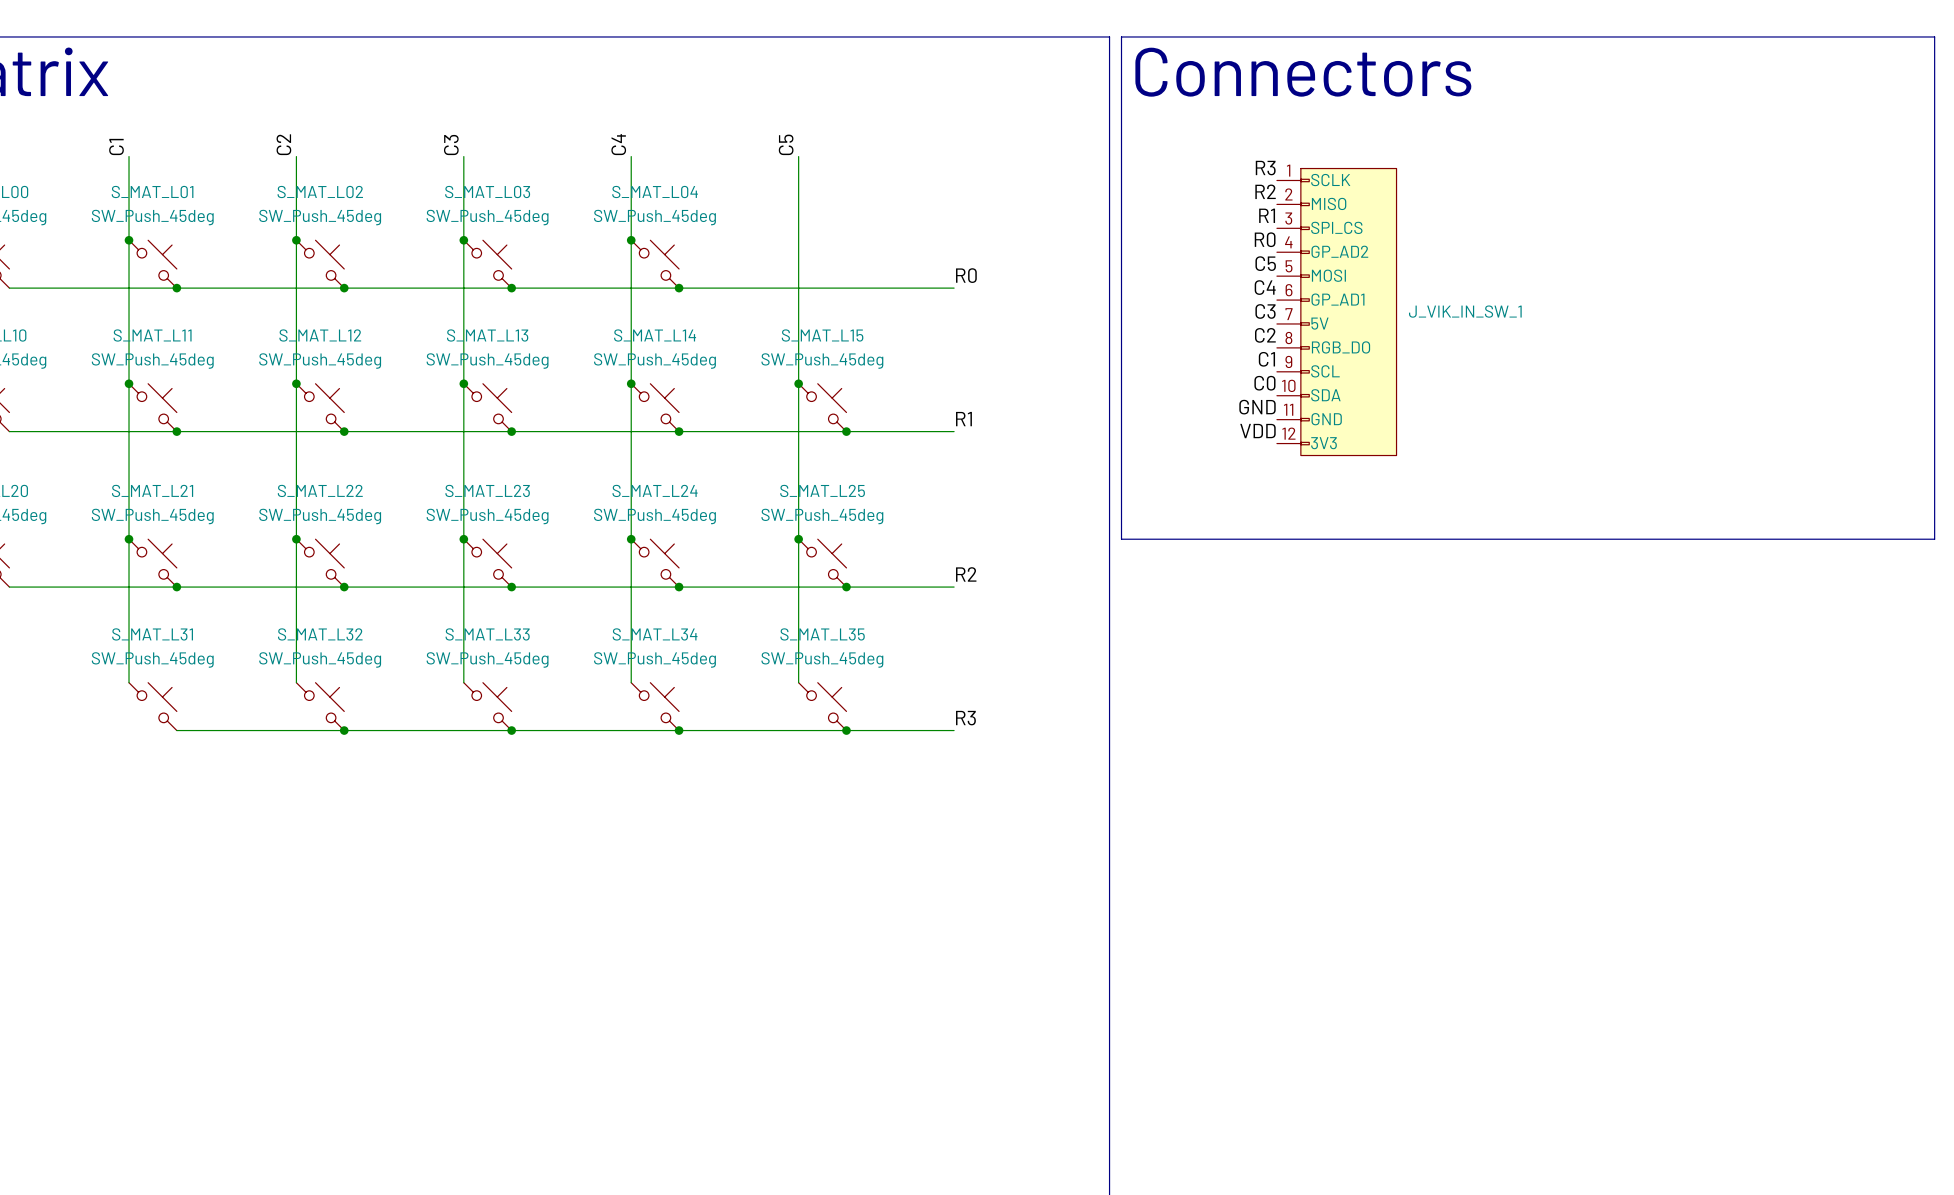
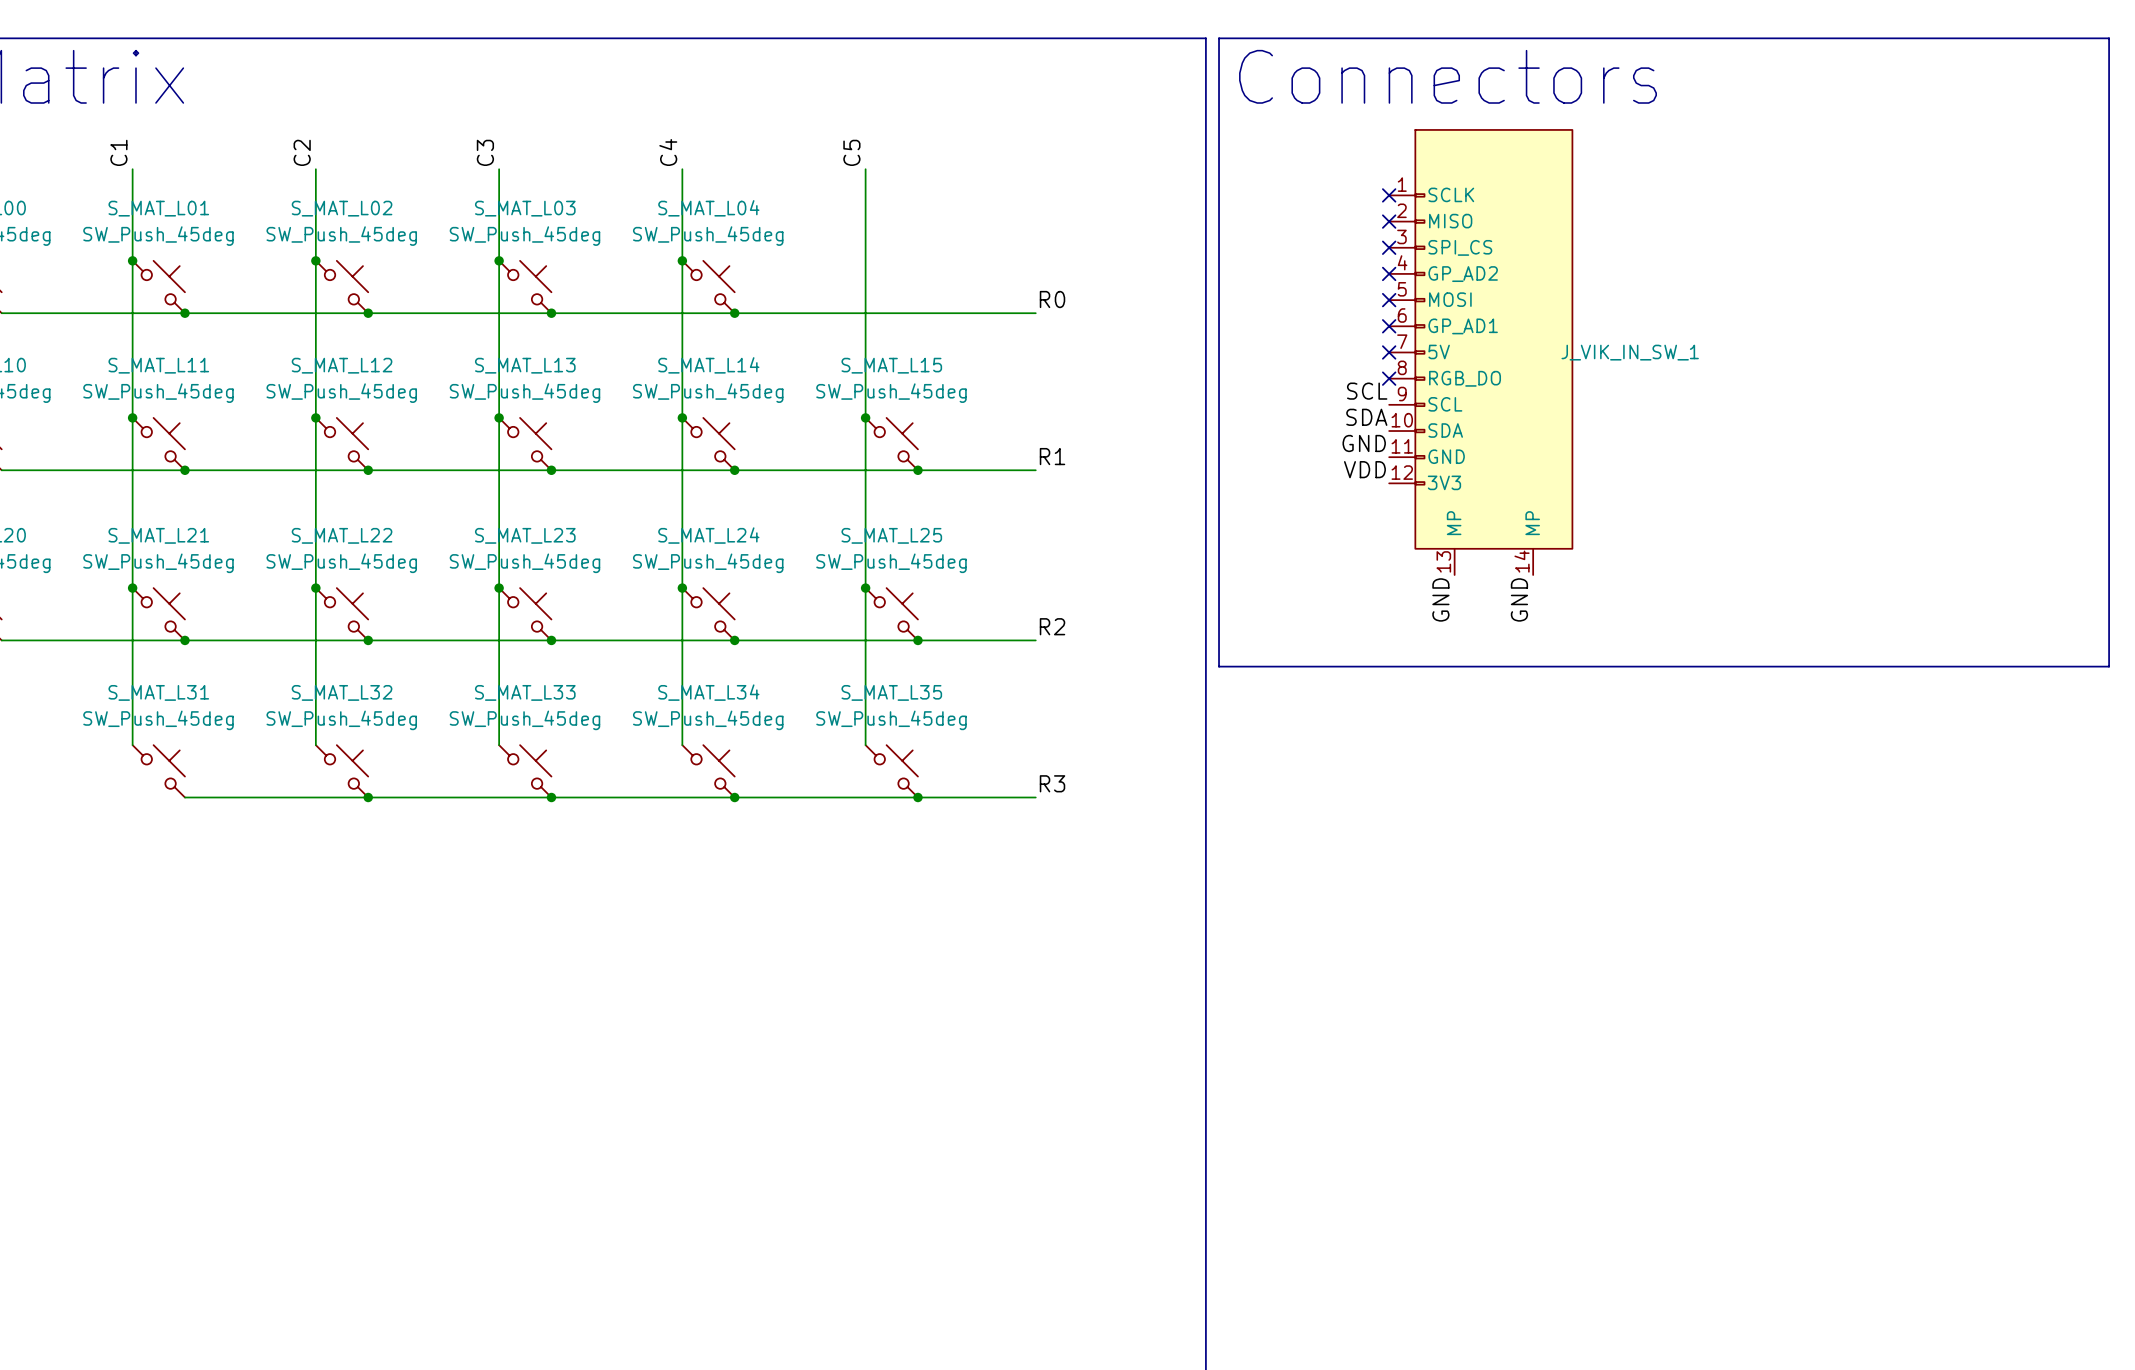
label: R3 (1265, 168) -> none
J_VIK_IN_SW_1 symbol: [1276, 168, 1397, 456] -> [1389, 129, 1573, 575]
no-connect mark: none -> (1389, 195)
label: R2 (1265, 191) -> none
no-connect mark: none -> (1389, 221)
label: R1 (1267, 215) -> none
no-connect mark: none -> (1389, 247)
label: R0 (1265, 239) -> none
no-connect mark: none -> (1389, 273)
label: C5 (1265, 263) -> none
no-connect mark: none -> (1389, 300)
label: C4 (1265, 287) -> none
no-connect mark: none -> (1389, 326)
label: C3 (1265, 311) -> none
no-connect mark: none -> (1389, 352)
label: C2 (1265, 335) -> none
no-connect mark: none -> (1389, 378)
label: C1 (1266, 359) -> SCL (1367, 391)
label: C0 (1264, 383) -> SDA (1366, 417)
line: (1121, 539) (1934, 539) -> (1219, 588) (1219, 666) (2109, 666) (2109, 588)
label: none -> GND (1440, 599)
label: none -> GND (1519, 599)

